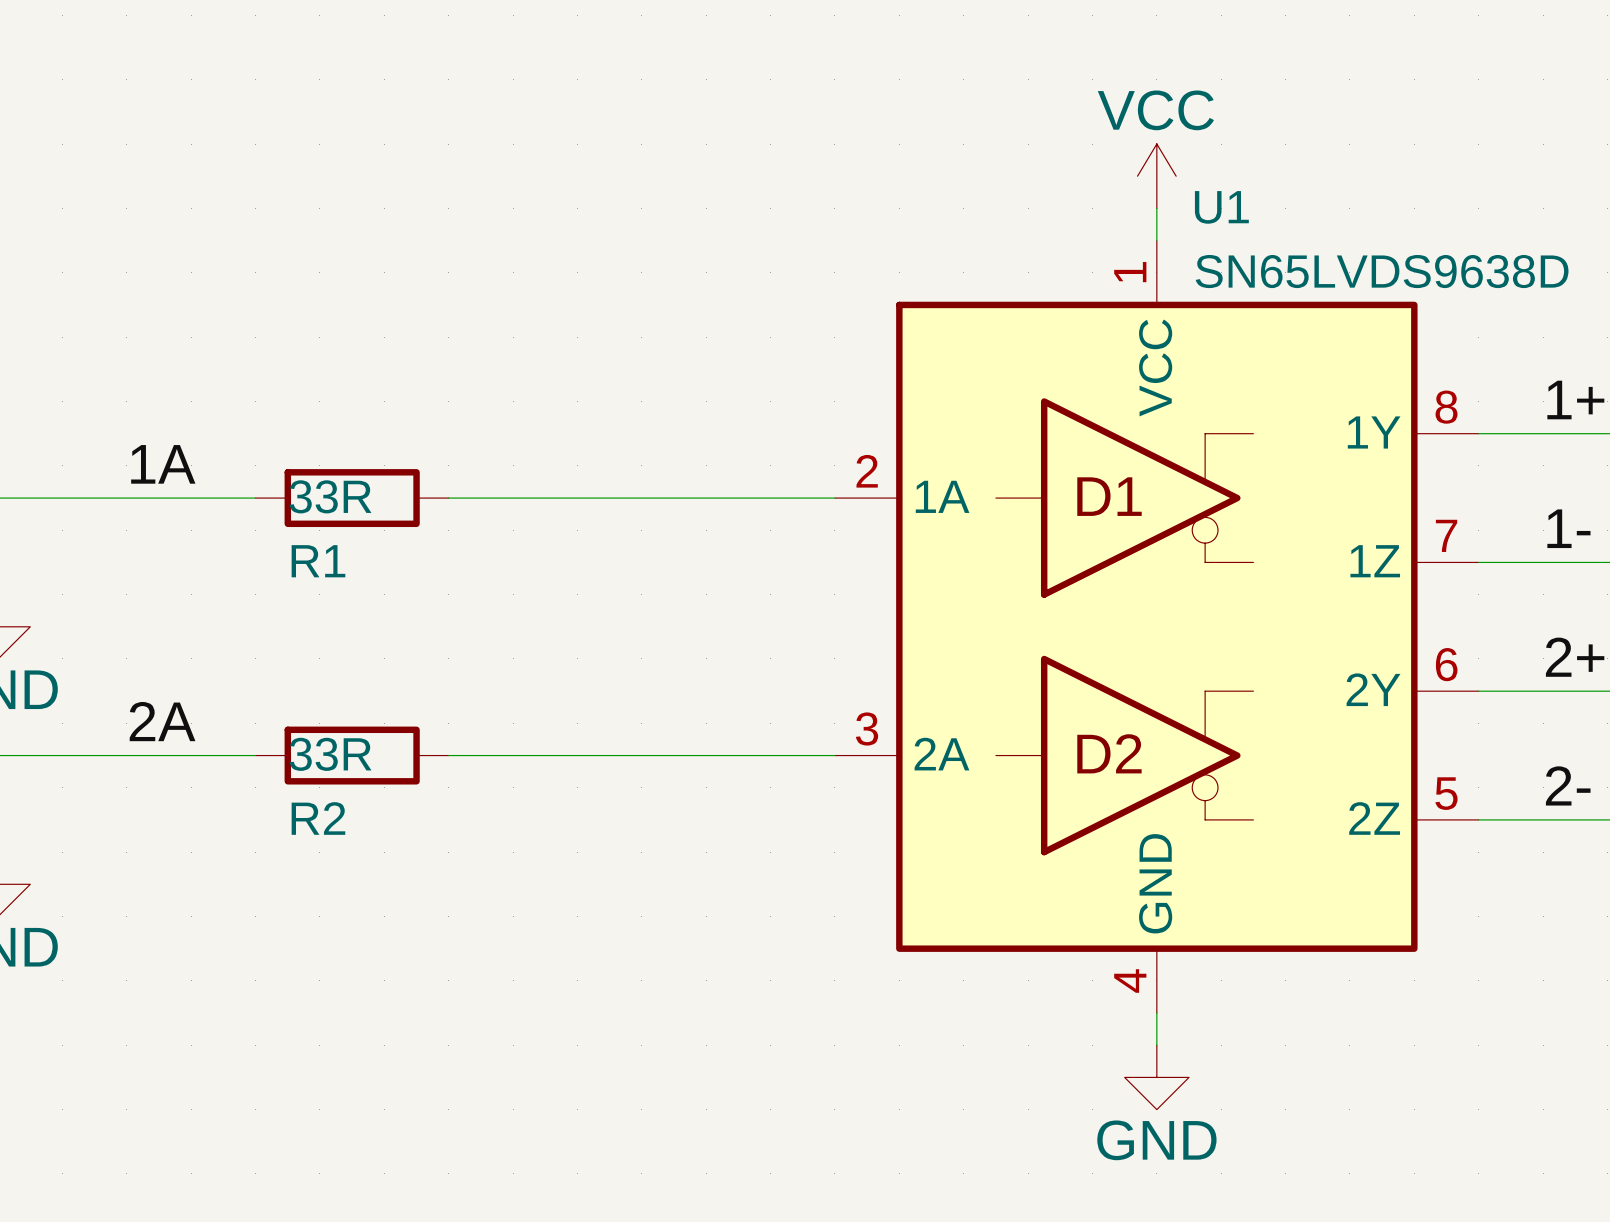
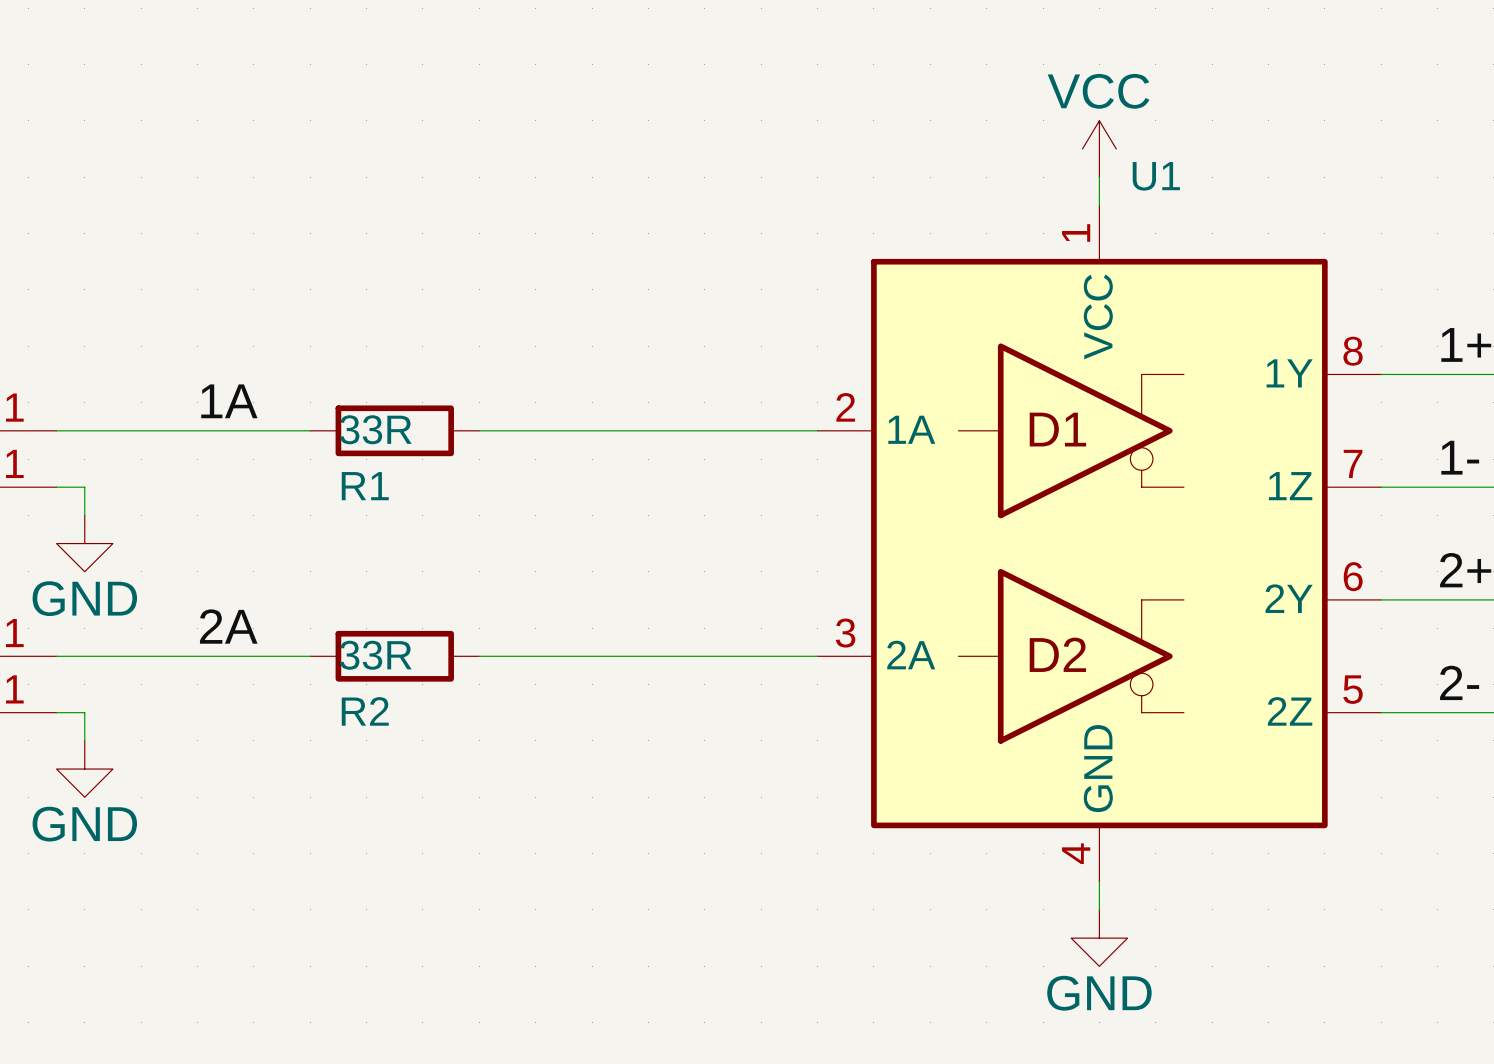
U1 value: SN65LVDS9638D (1382, 271) -> none

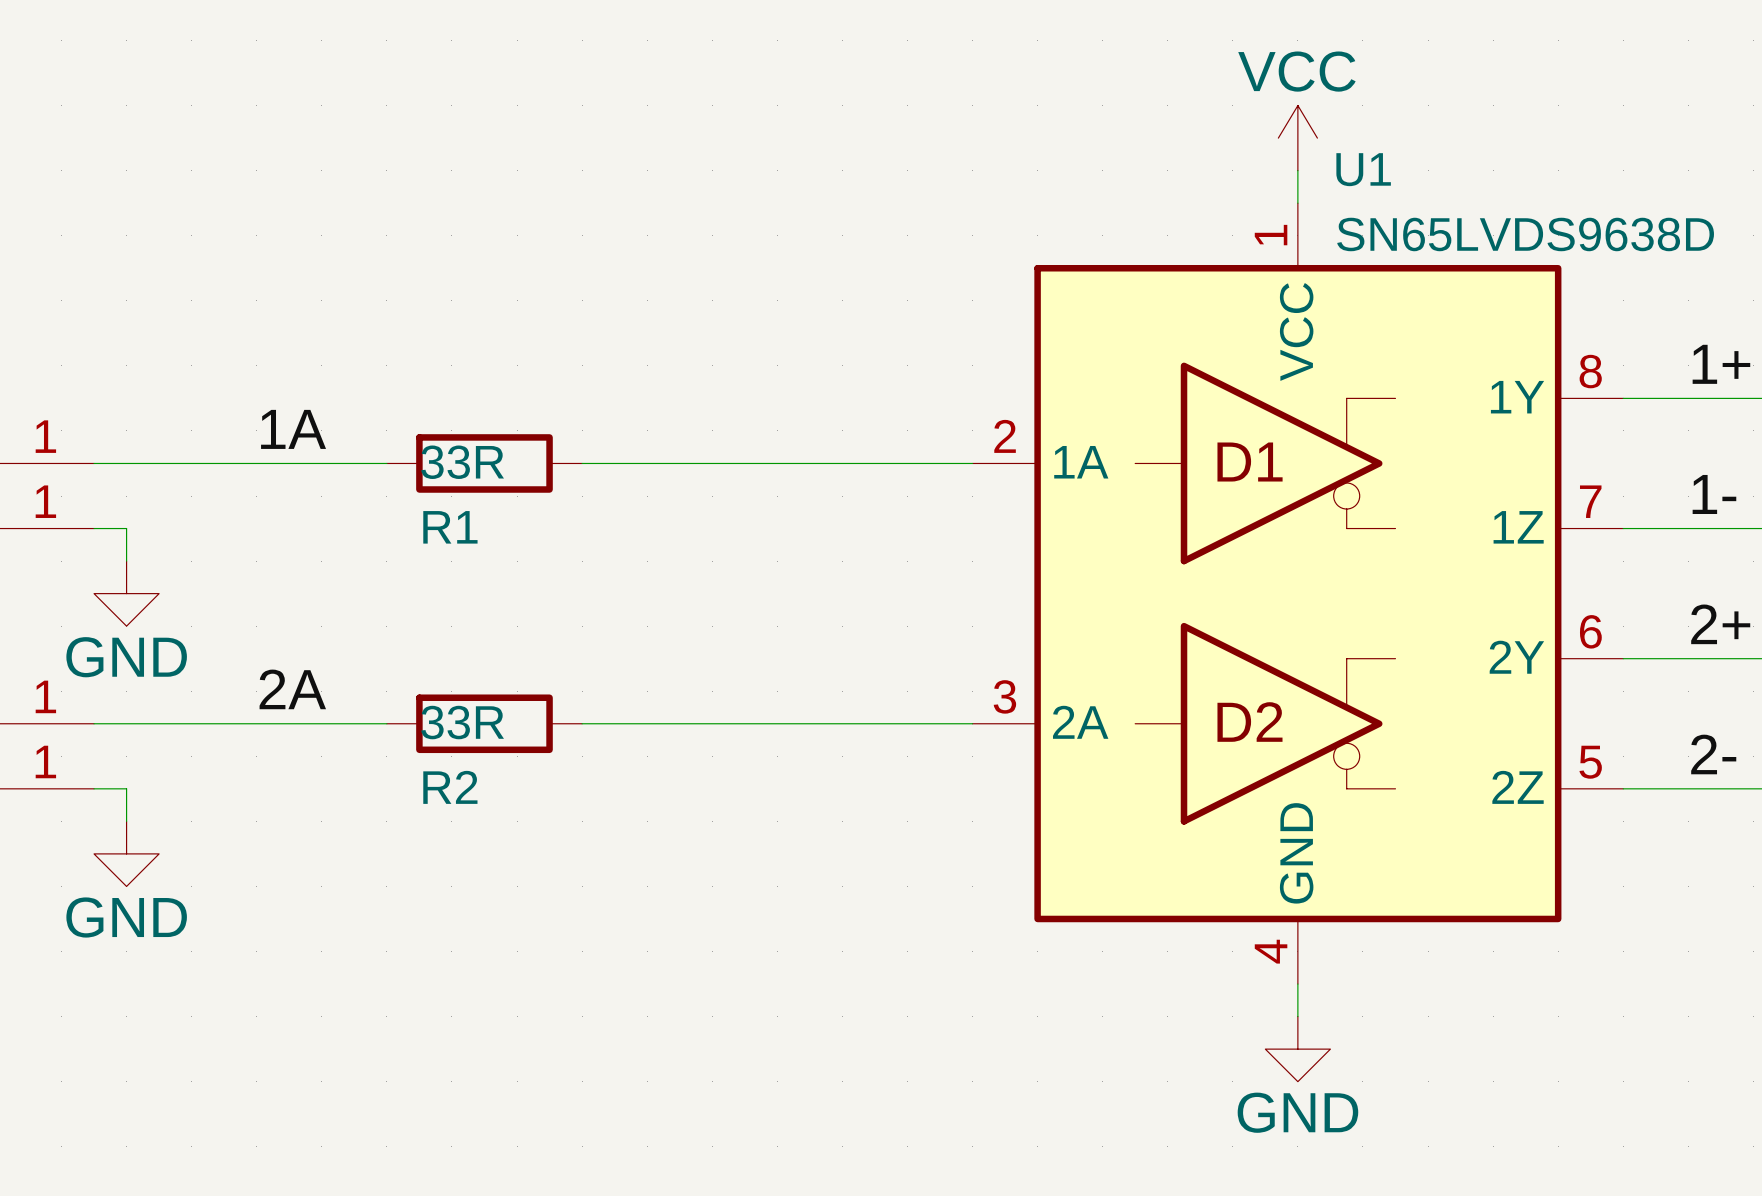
U1 value: none -> SN65LVDS9638D (1525, 234)

